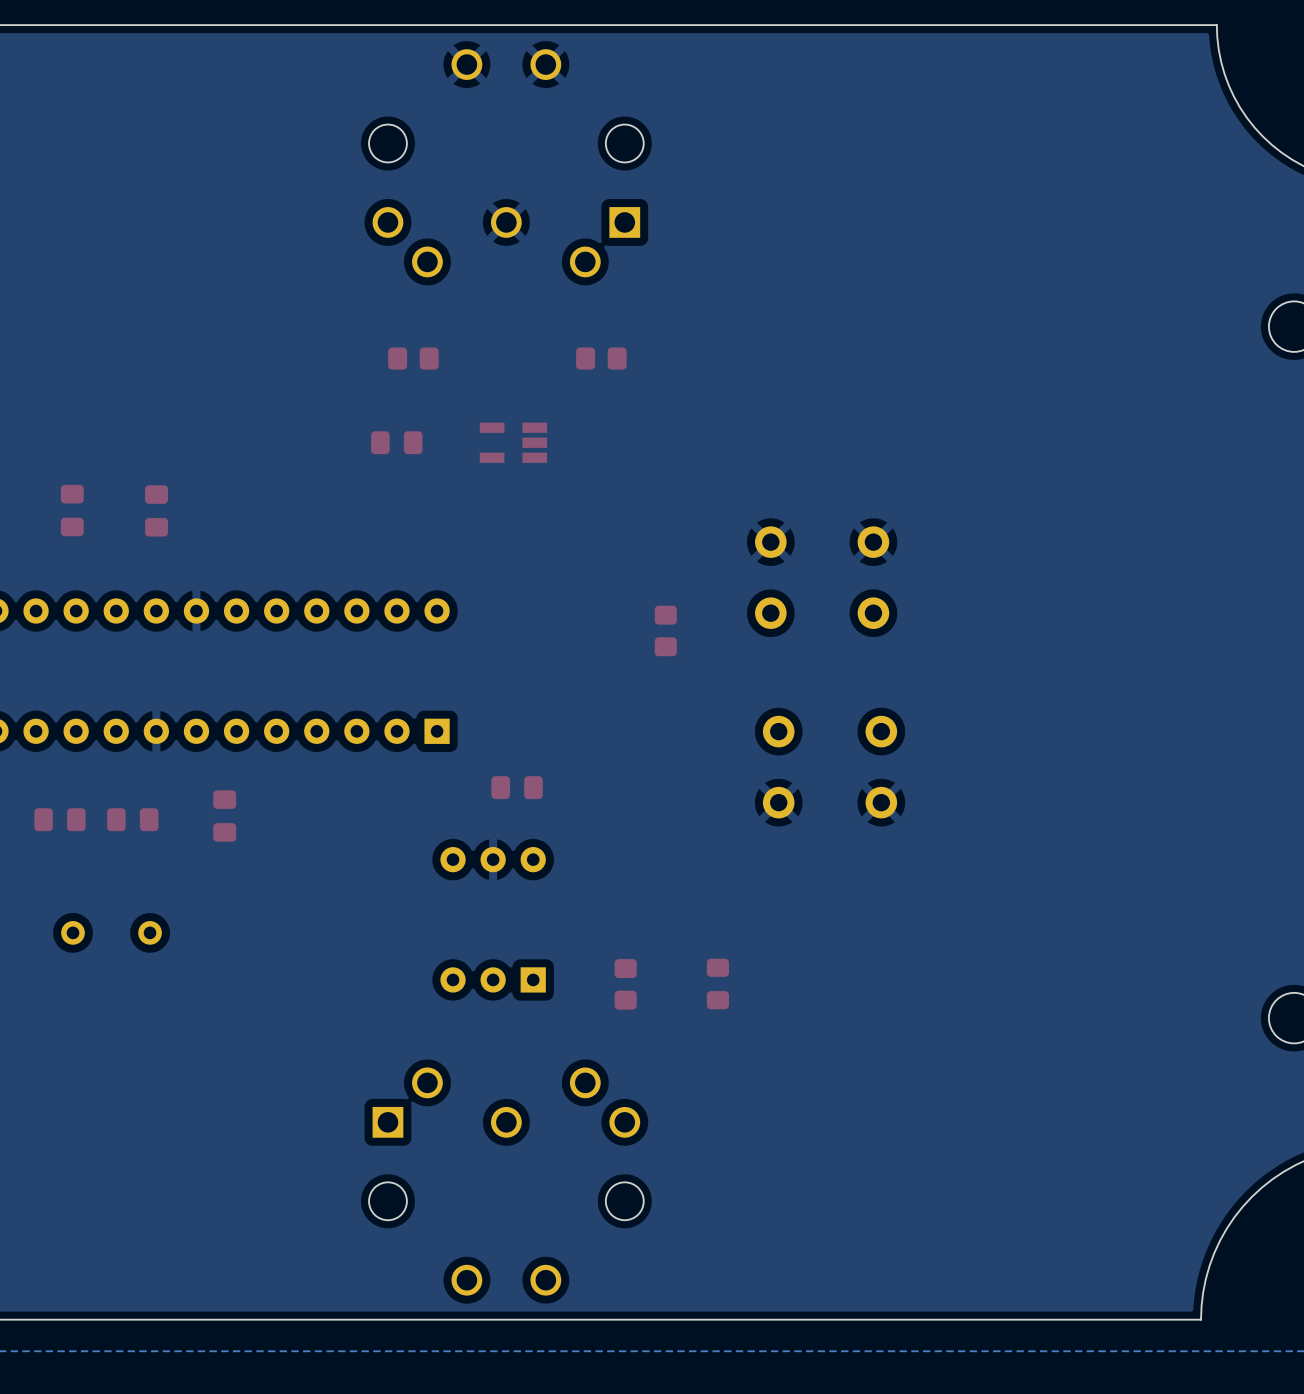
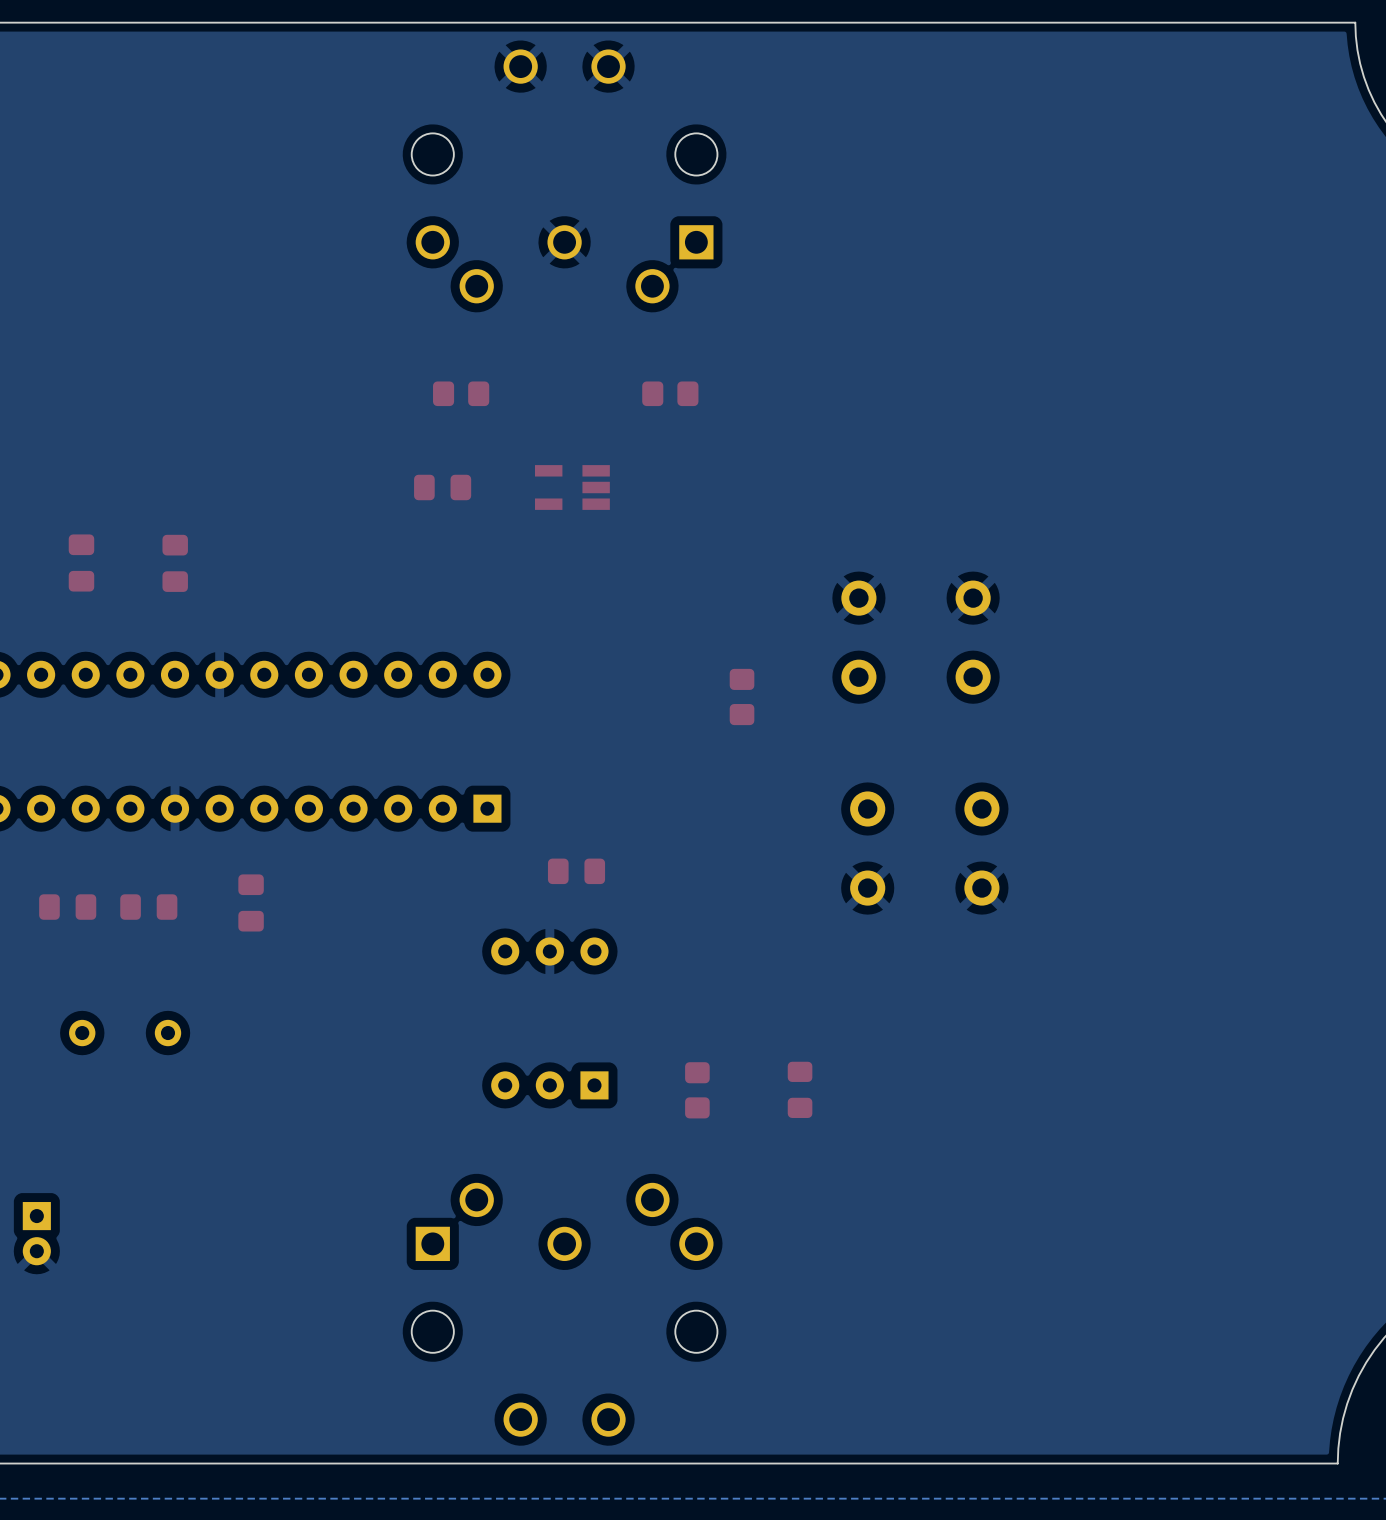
part: none -> (36, 1233)

